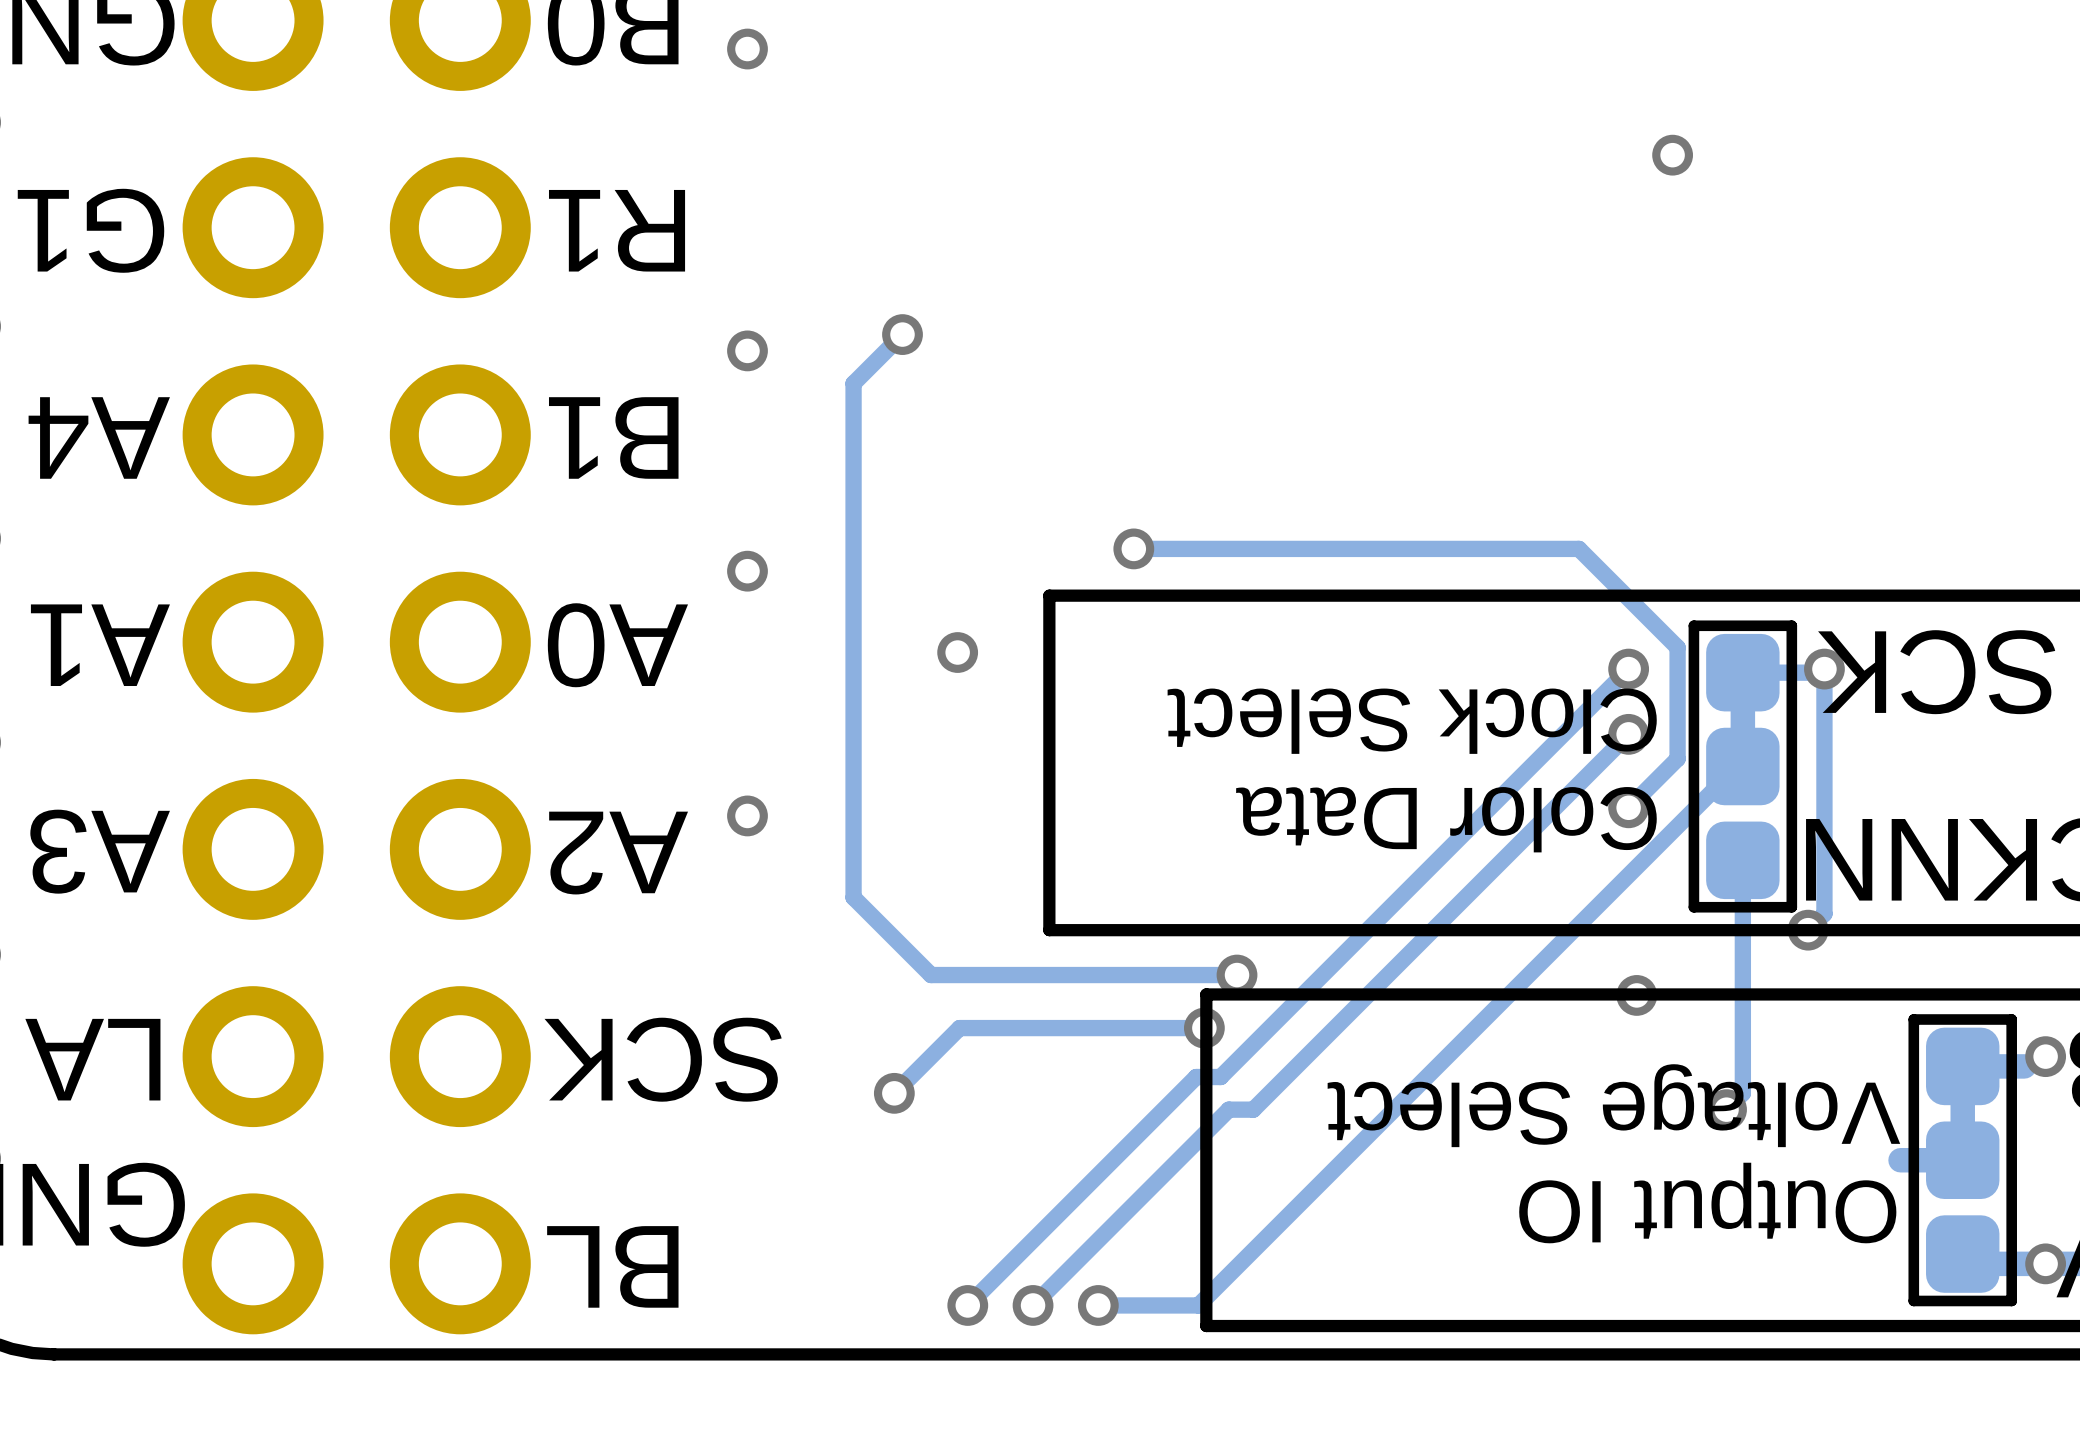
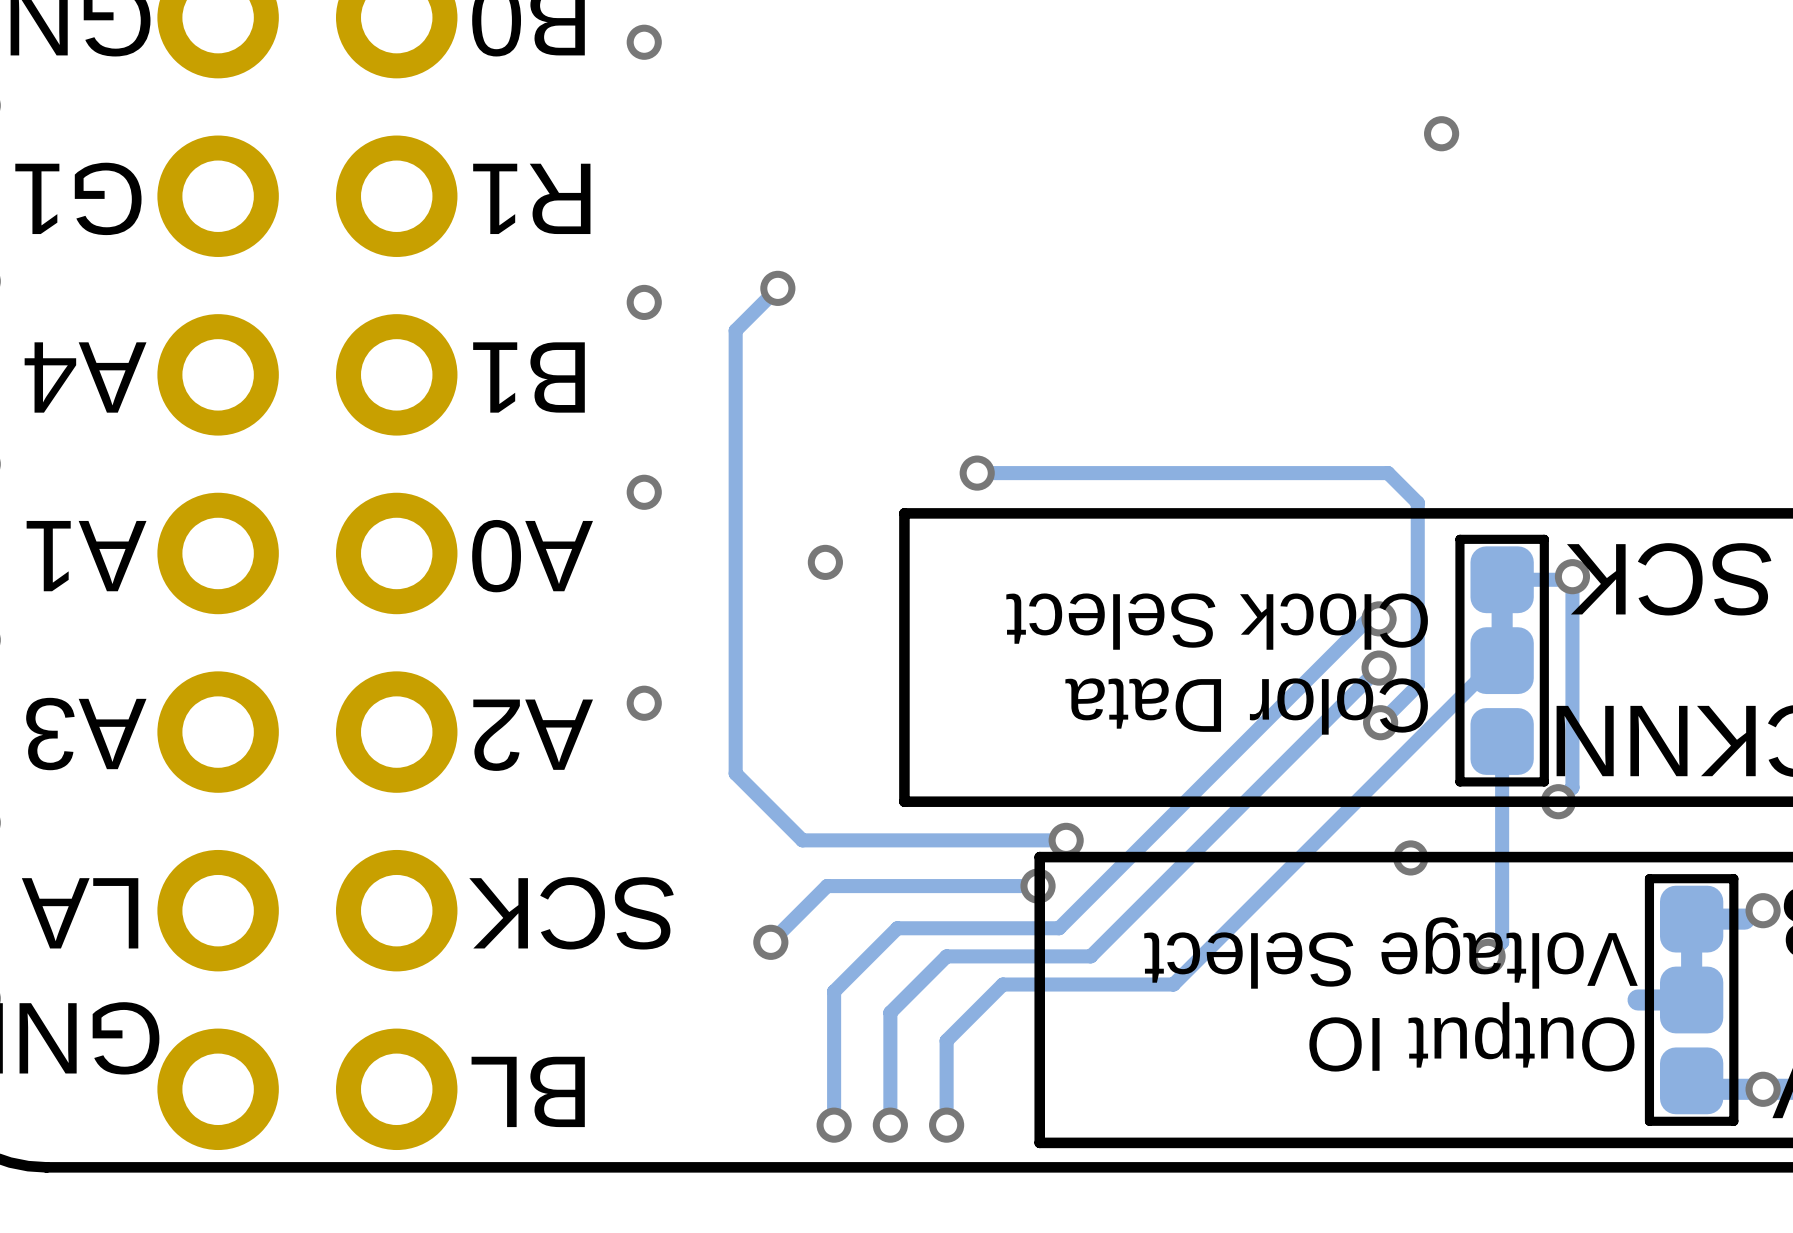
track: (1578, 548) (1677, 647) (1677, 758) (1628, 807) -> (1360, 473) (1388, 473) (1417, 502) (1417, 685) (1380, 722)
track: (1628, 669) (1220, 1077) -> (1379, 618) (1368, 618) (1059, 928) (1052, 928)
via: (1628, 669) -> none
via: none -> (1379, 618)
track: (1628, 734) (1253, 1109) -> (1379, 668) (1090, 956) (1080, 956)
via: (1628, 734) -> none
via: none -> (1379, 668)
via: (1628, 807) -> none
via: none -> (1380, 722)
track: (1196, 1077) (967, 1305) -> (1031, 928) (897, 928) (834, 991) (834, 1125)
track: (1228, 1109) (1033, 1305) -> (1059, 956) (946, 956) (890, 1012) (890, 1125)
track: (1361, 1142) (1198, 1305) (1098, 1305) -> (1173, 984) (1002, 984) (946, 1040) (946, 1125)

